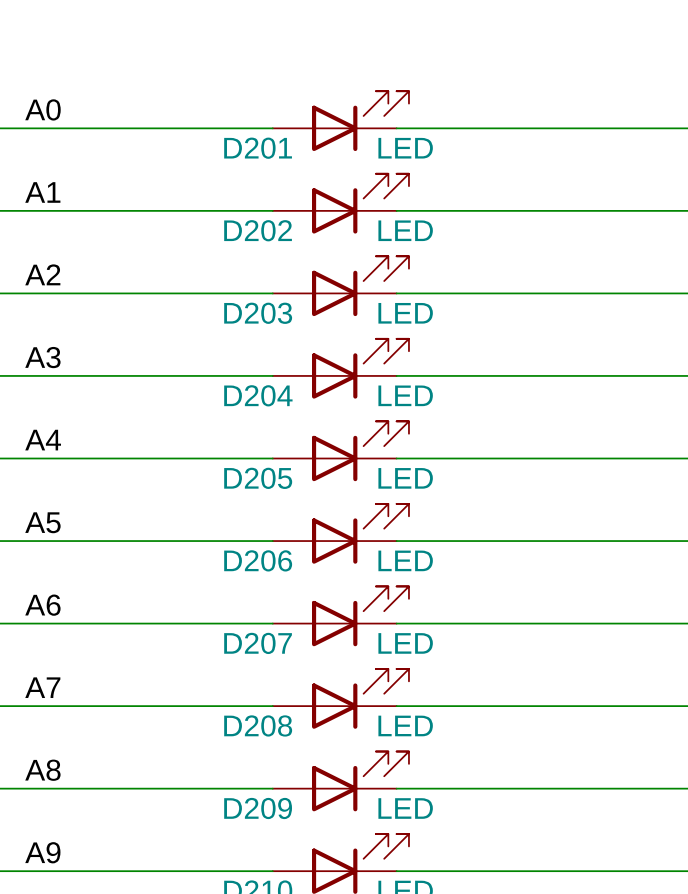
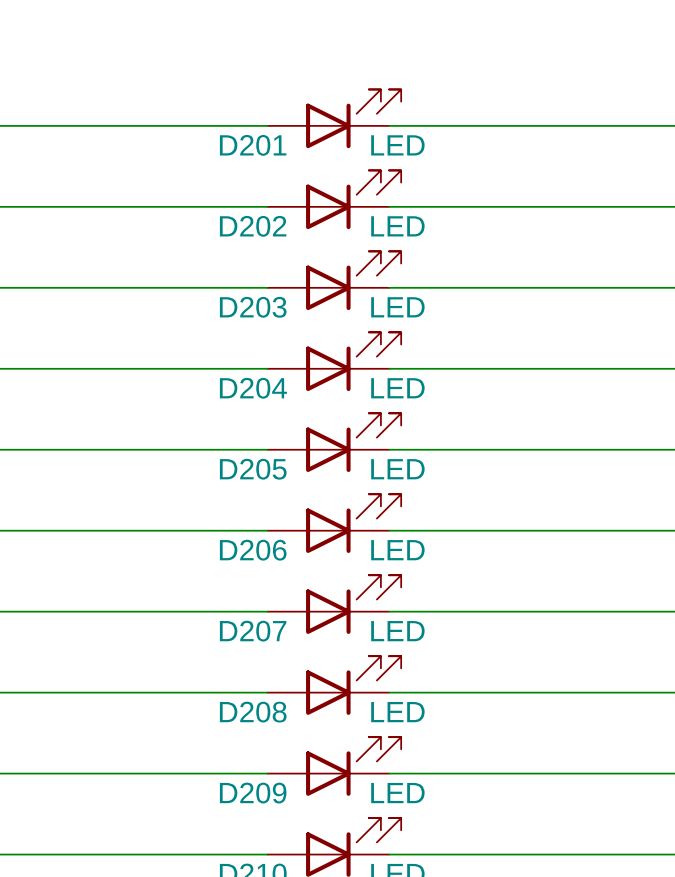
label: A0 (42, 109) -> none
label: A1 (42, 192) -> none
label: A2 (42, 274) -> none
label: A3 (42, 357) -> none
label: A4 (43, 440) -> none
label: A5 (42, 522) -> none
label: A6 (42, 605) -> none
label: A7 (42, 687) -> none
label: A8 (42, 770) -> none
label: A9 (42, 852) -> none

